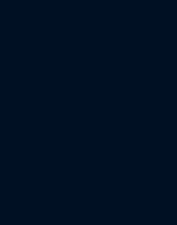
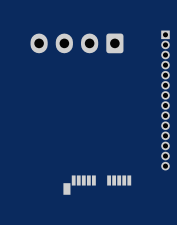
part: none -> (76, 43)
part: none -> (165, 100)
part: none -> (97, 185)

